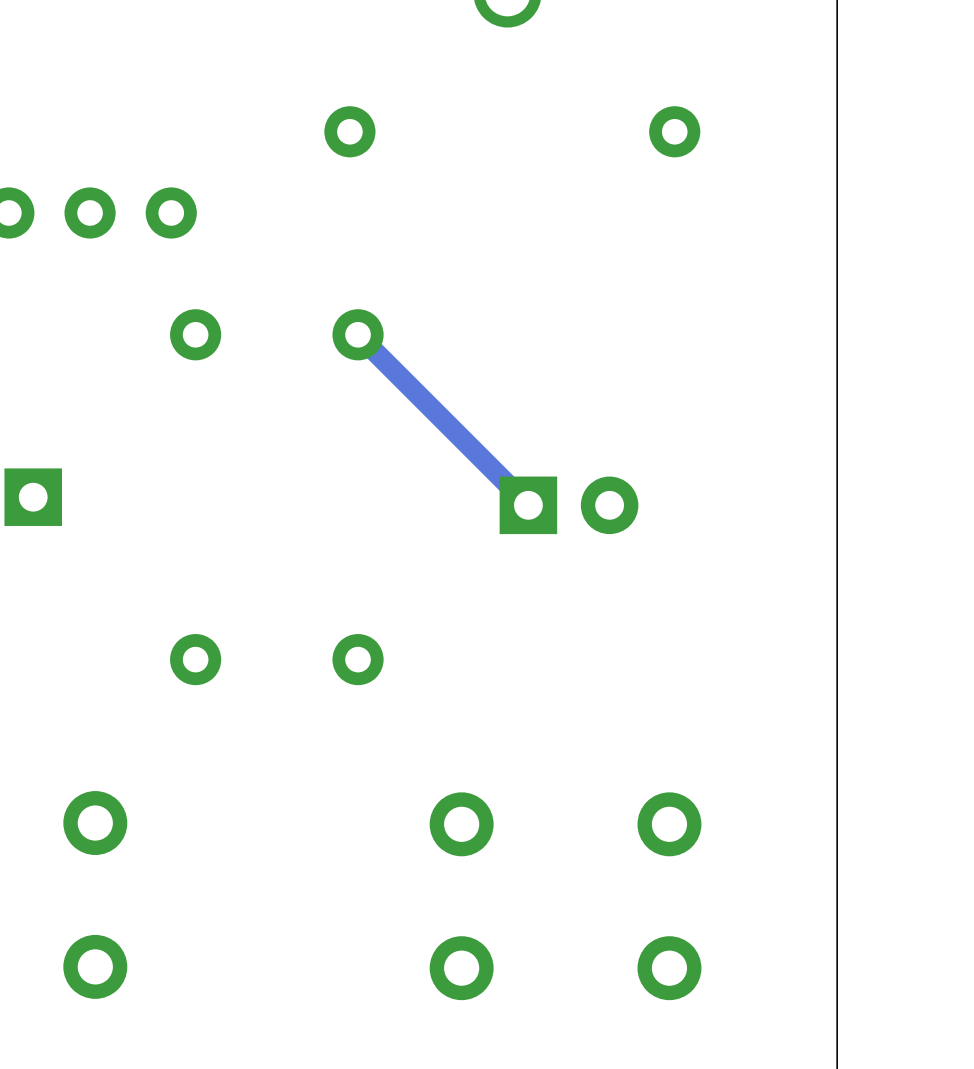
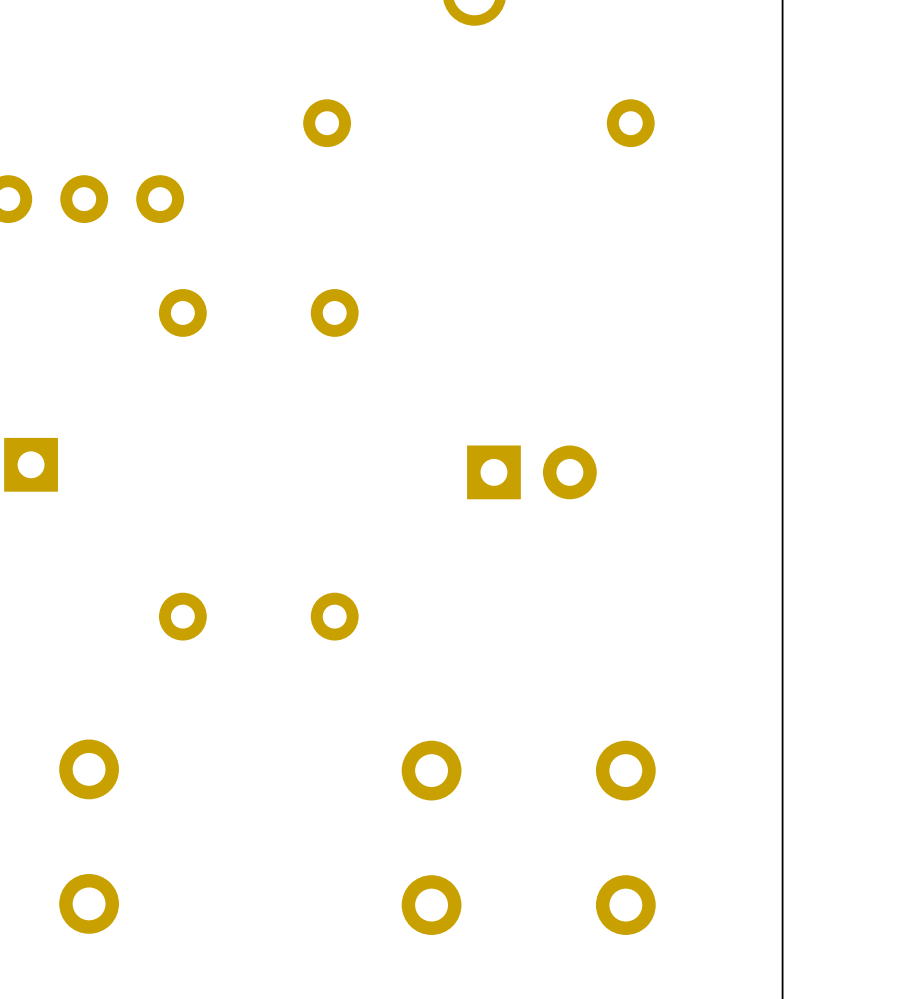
track: (358, 334) (528, 505) -> none

